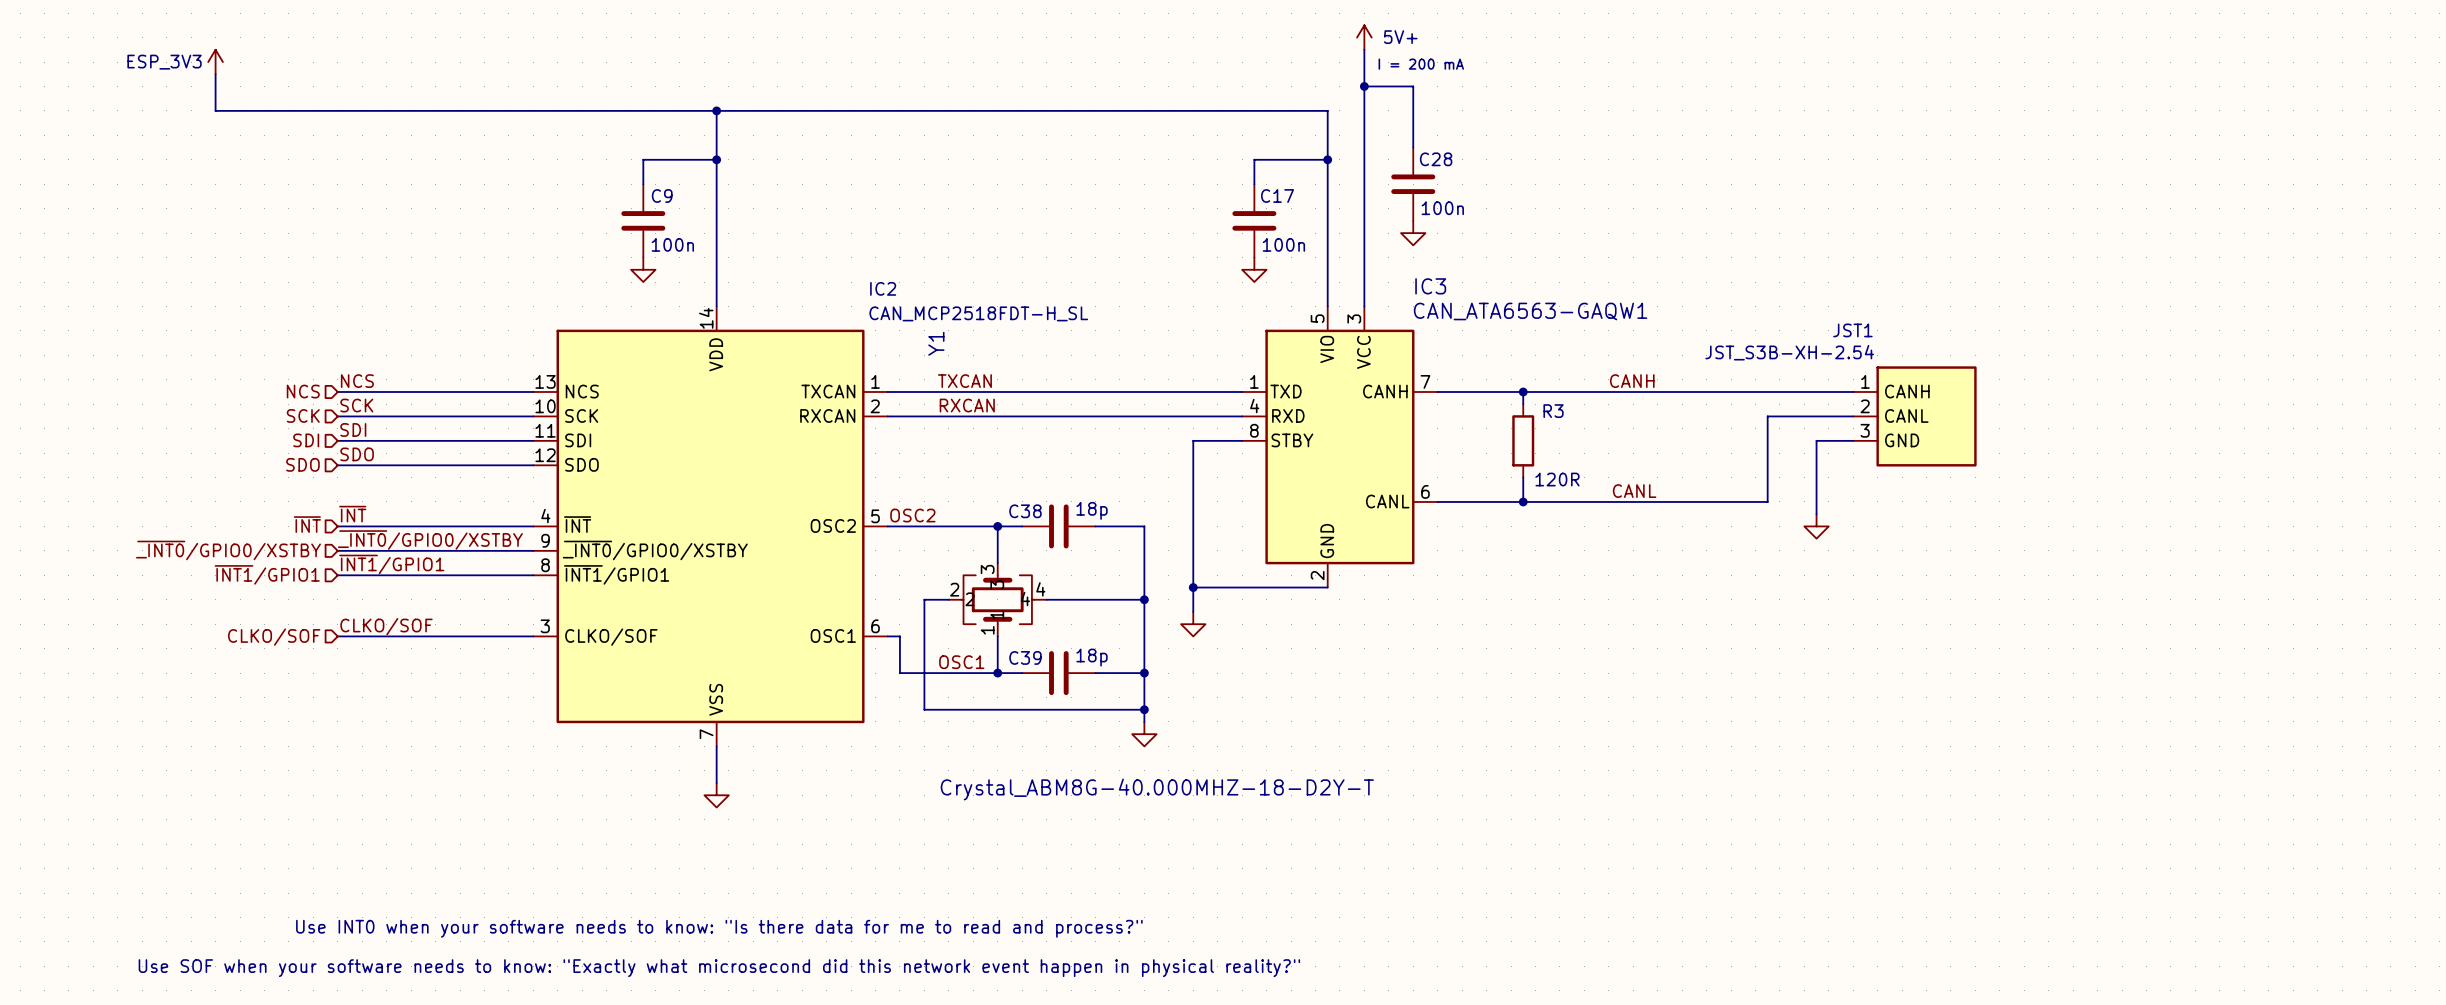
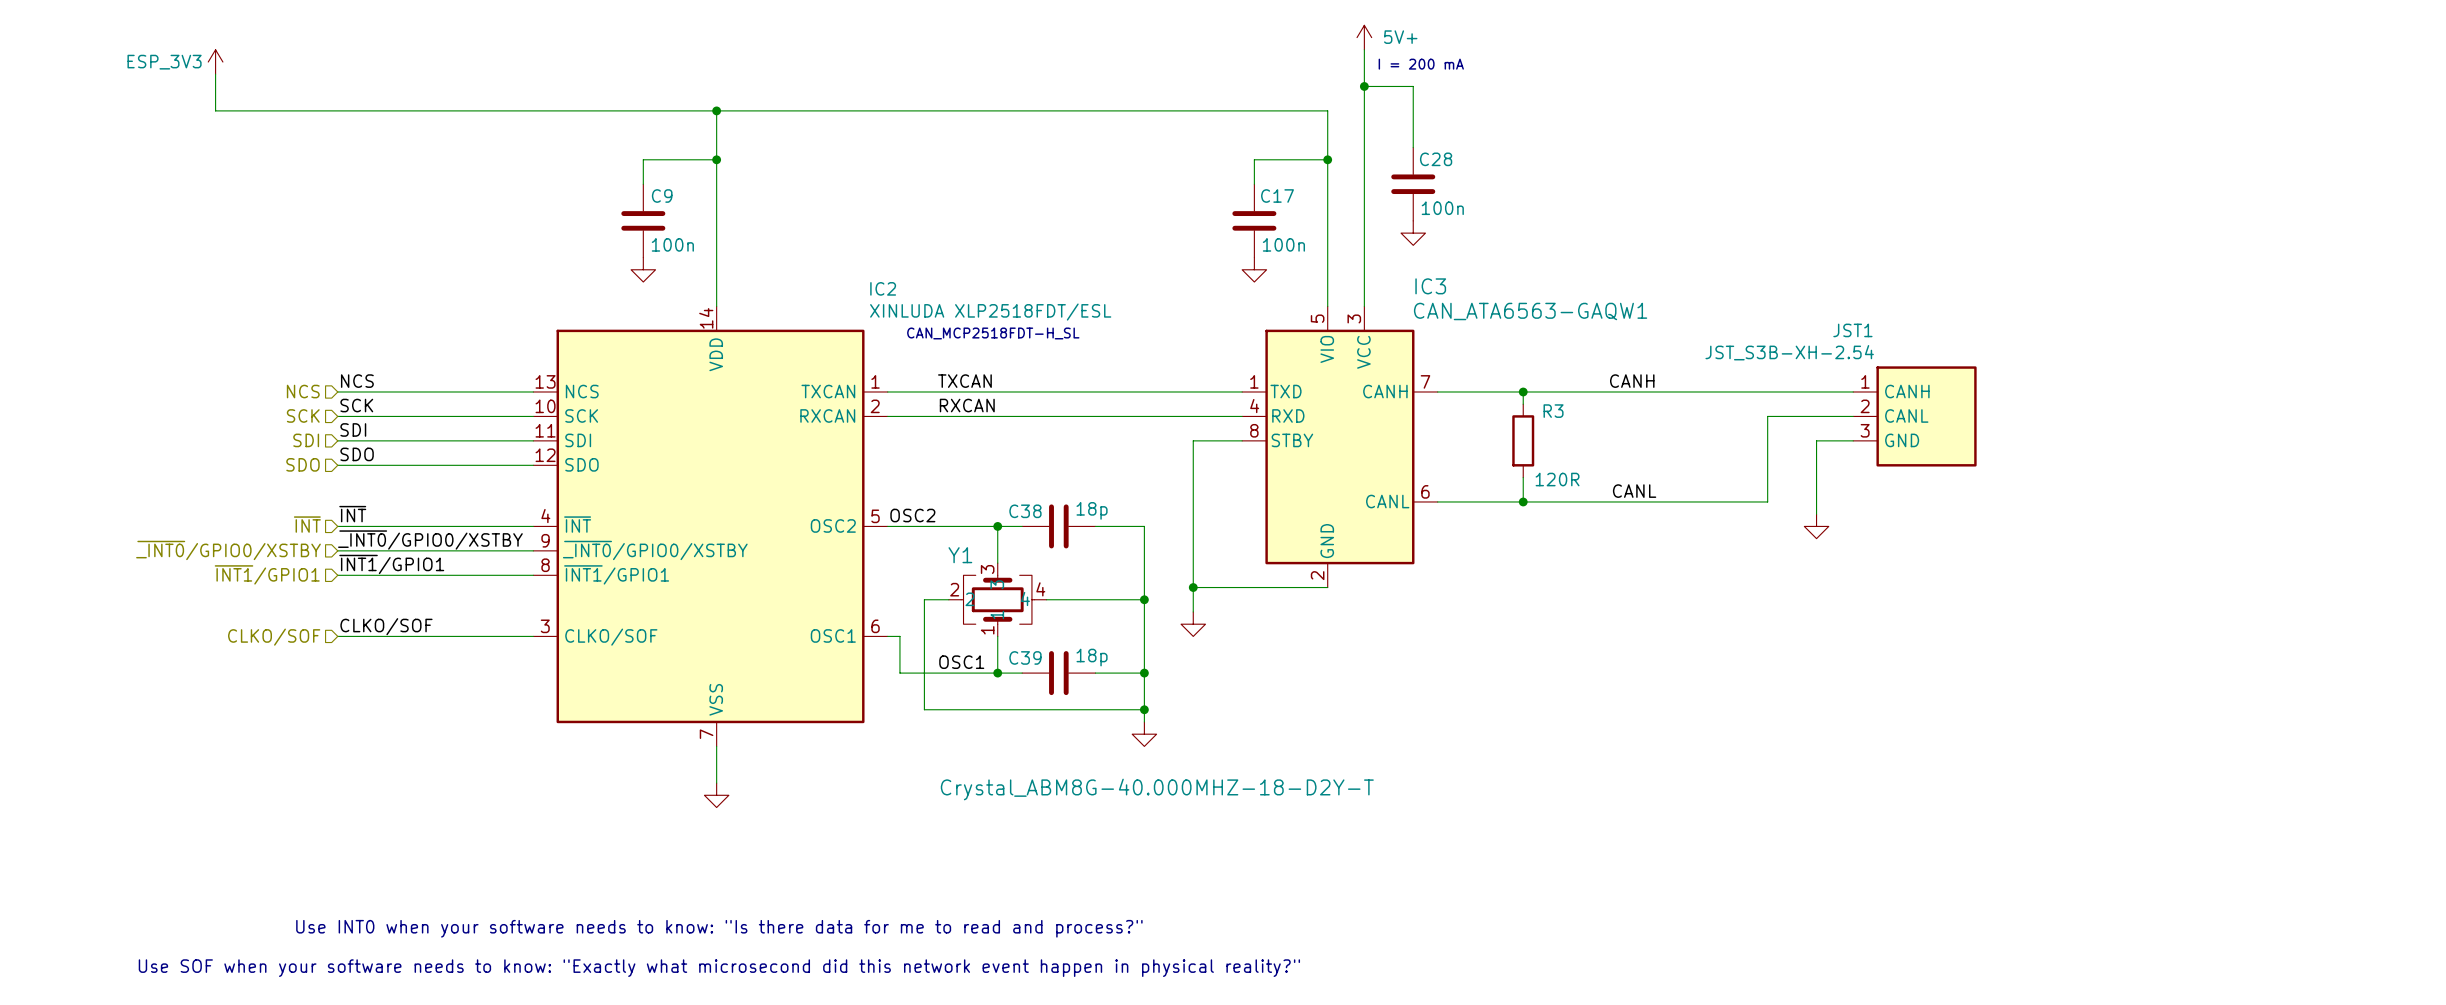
IC2 value: CAN_MCP2518FDT-H_SL (978, 313) -> XINLUDA XLP2518FDT/ESL (990, 312)
text: none -> CAN_MCP2518FDT-H_SL (993, 333)
Y1 name rotation: 0° (936, 343) -> 90° clockwise (960, 555)
Y1 name position: Y1 (936, 343) -> Y1 (960, 555)

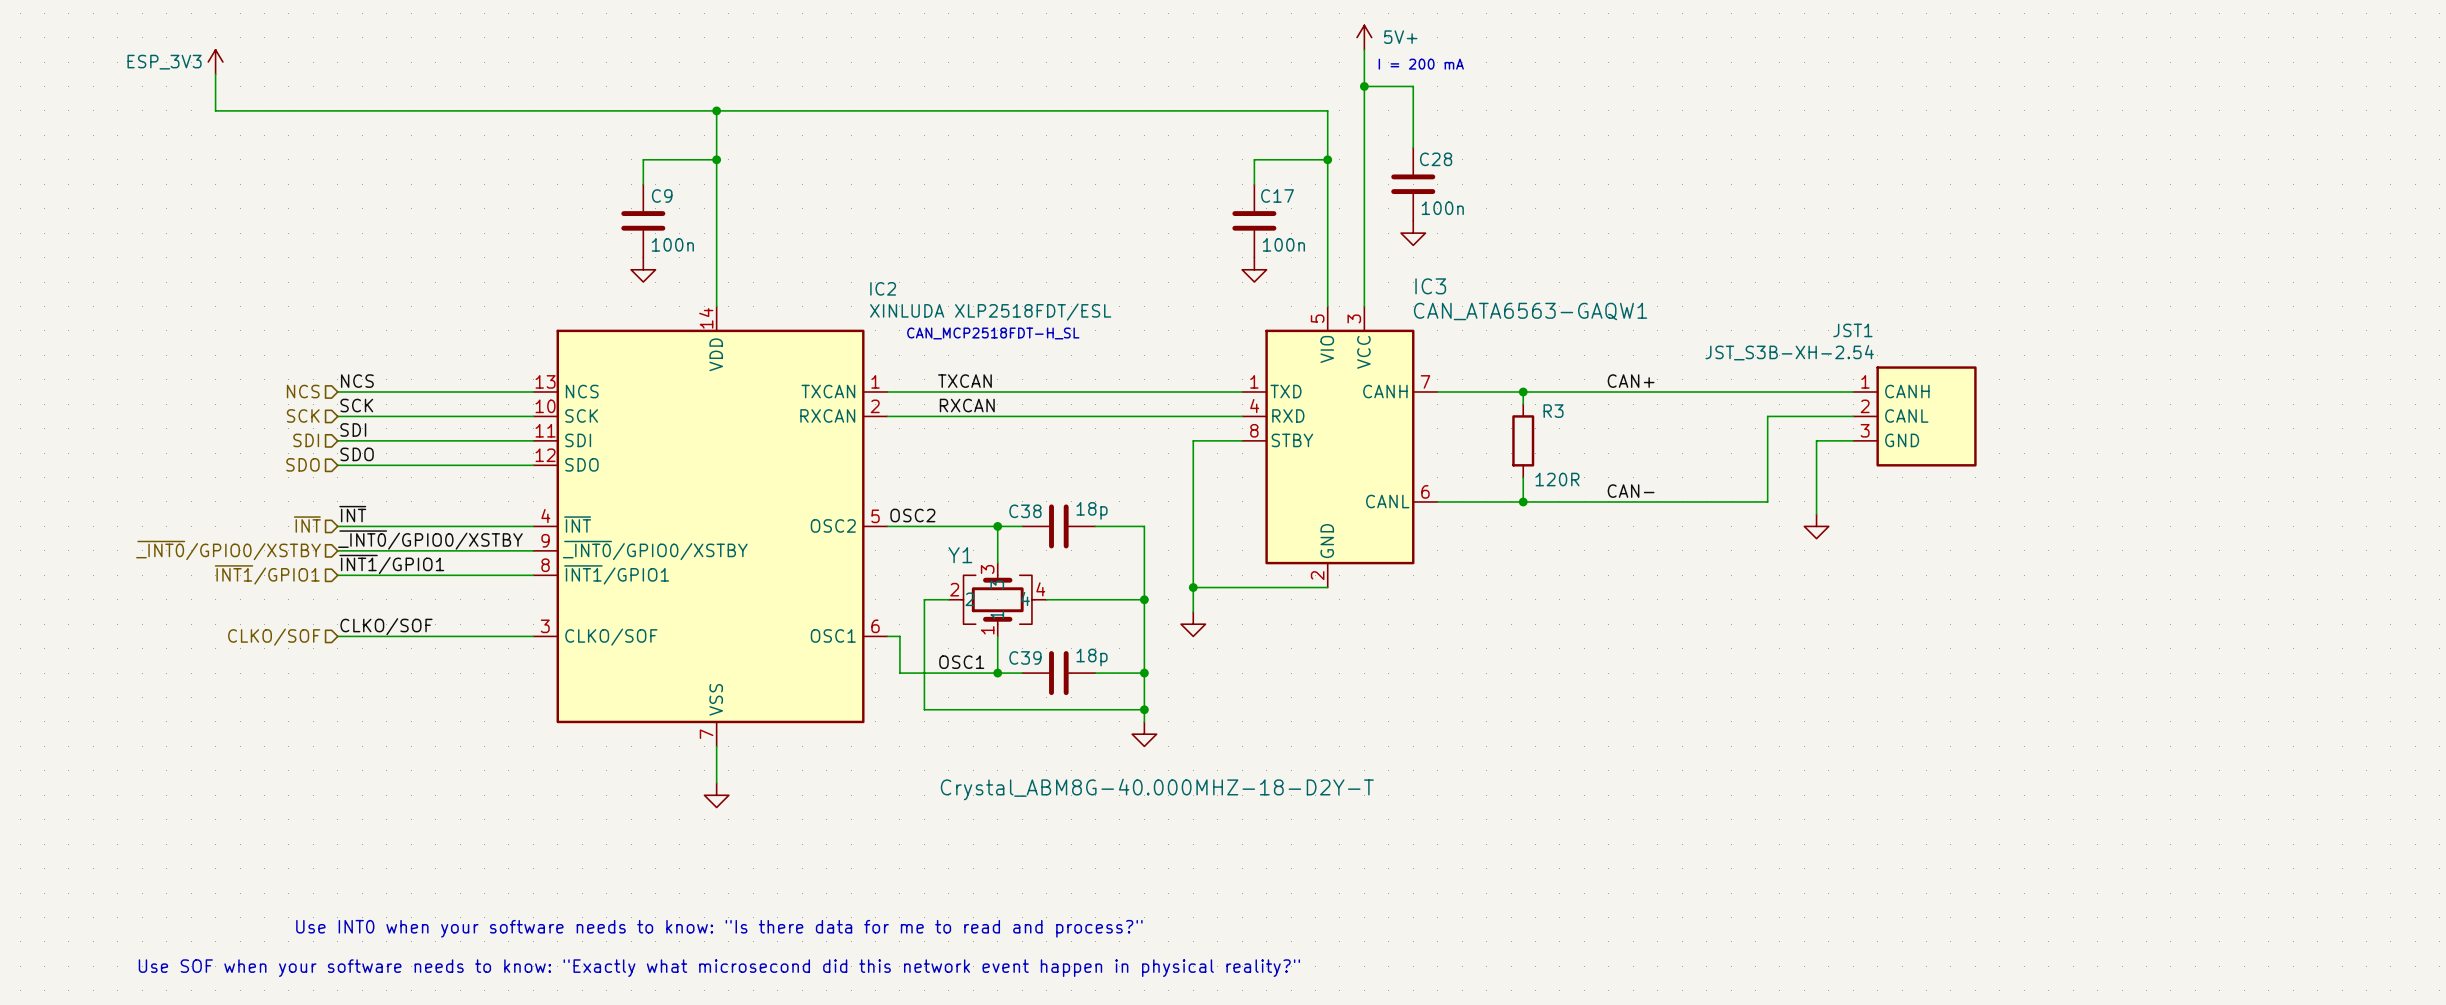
label: CANH (1632, 381) -> CAN+ (1631, 381)
label: CANL (1634, 491) -> CAN- (1631, 491)

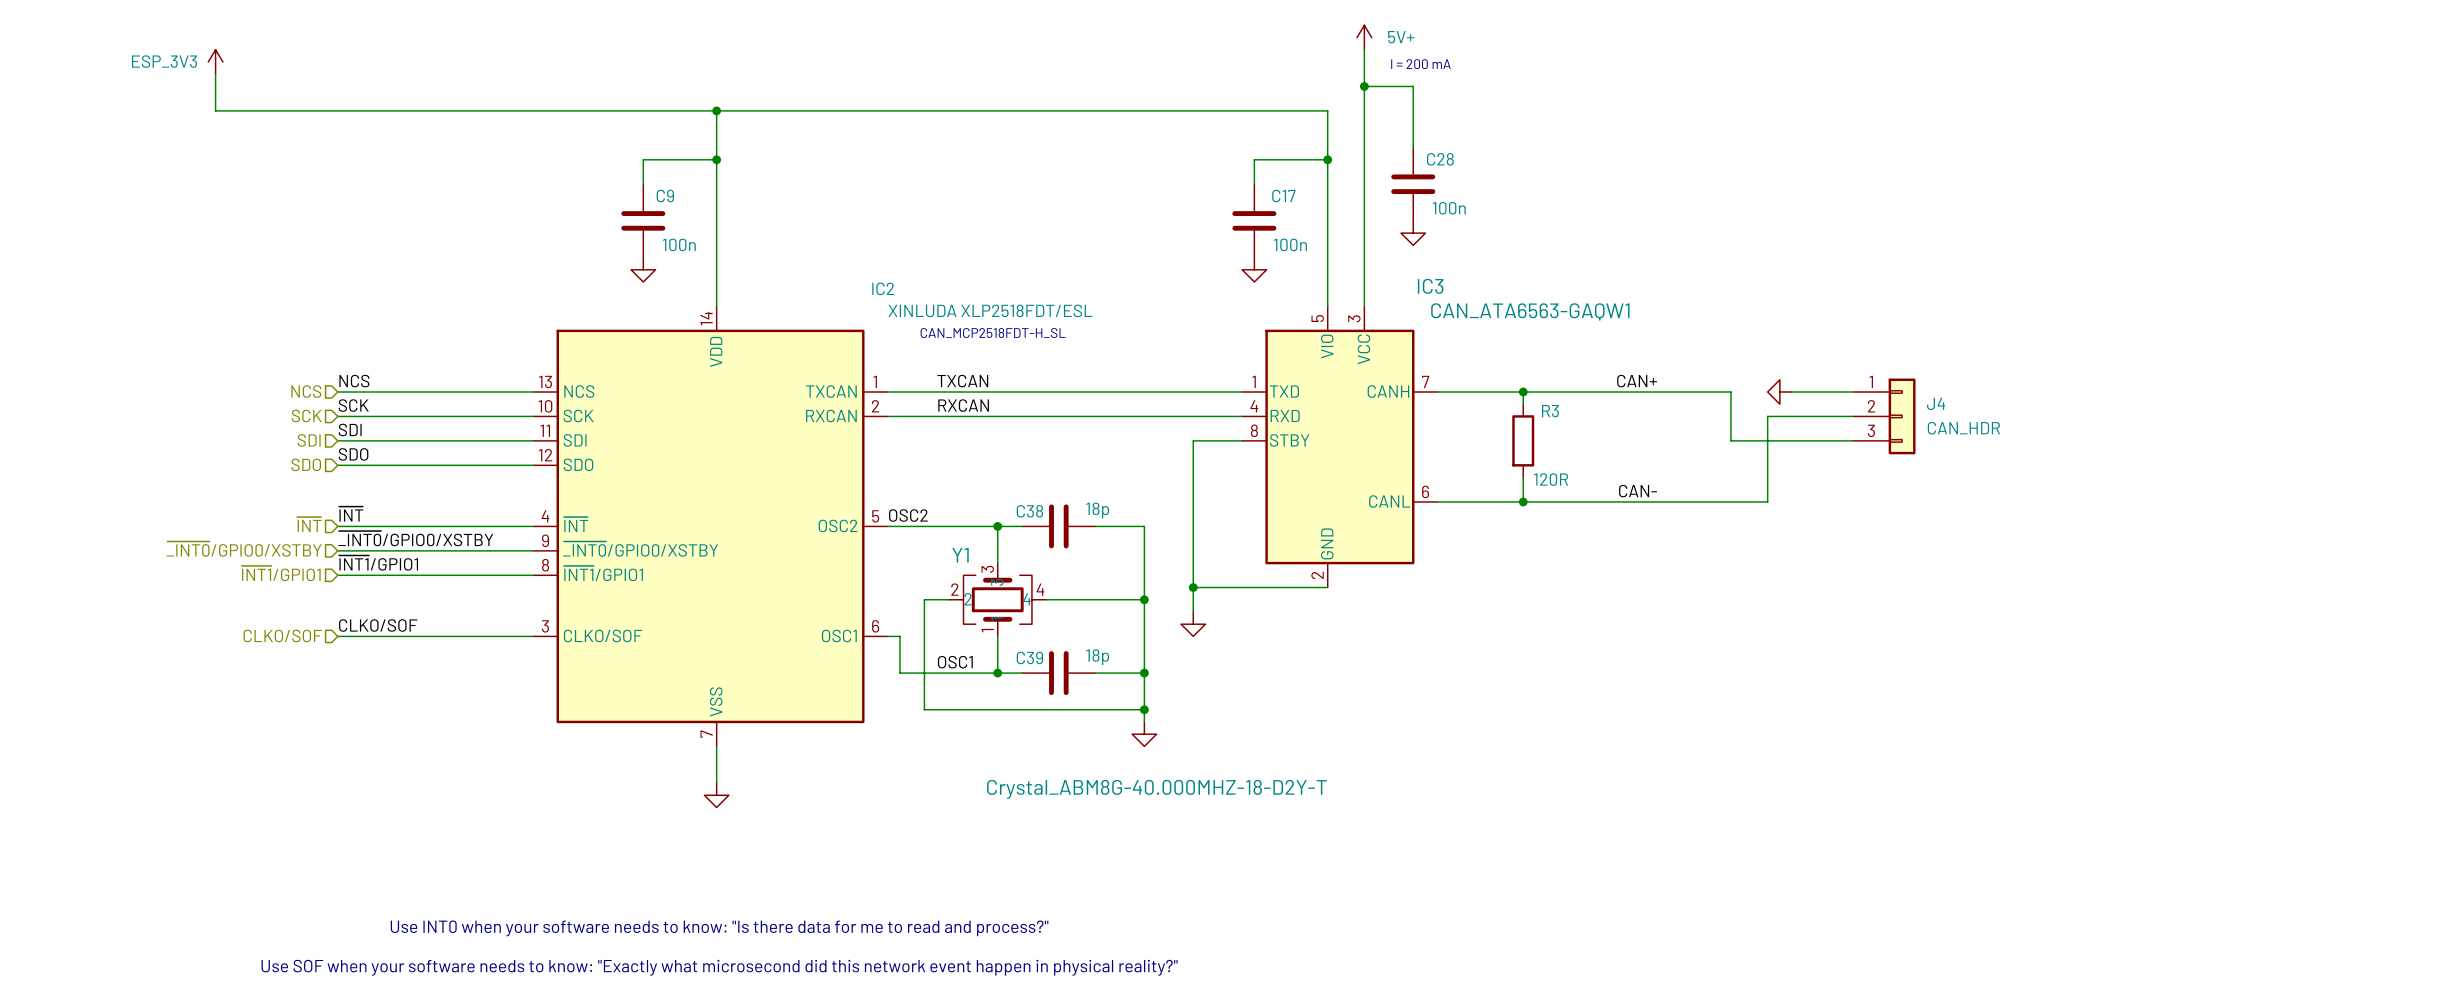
wire: (1731, 391) (1792, 391) -> (1731, 391) (1731, 440) (1816, 440)
J4: none -> CAN_HDR (1884, 416)
JST1: JST_S3B-XH-2.54 (1914, 416) -> none
wire: (1816, 440) (1816, 514) -> none
power symbol rotation: 0° (1816, 526) -> 90° clockwise (1779, 391)
power symbol position: (1816, 526) -> (1779, 391)

